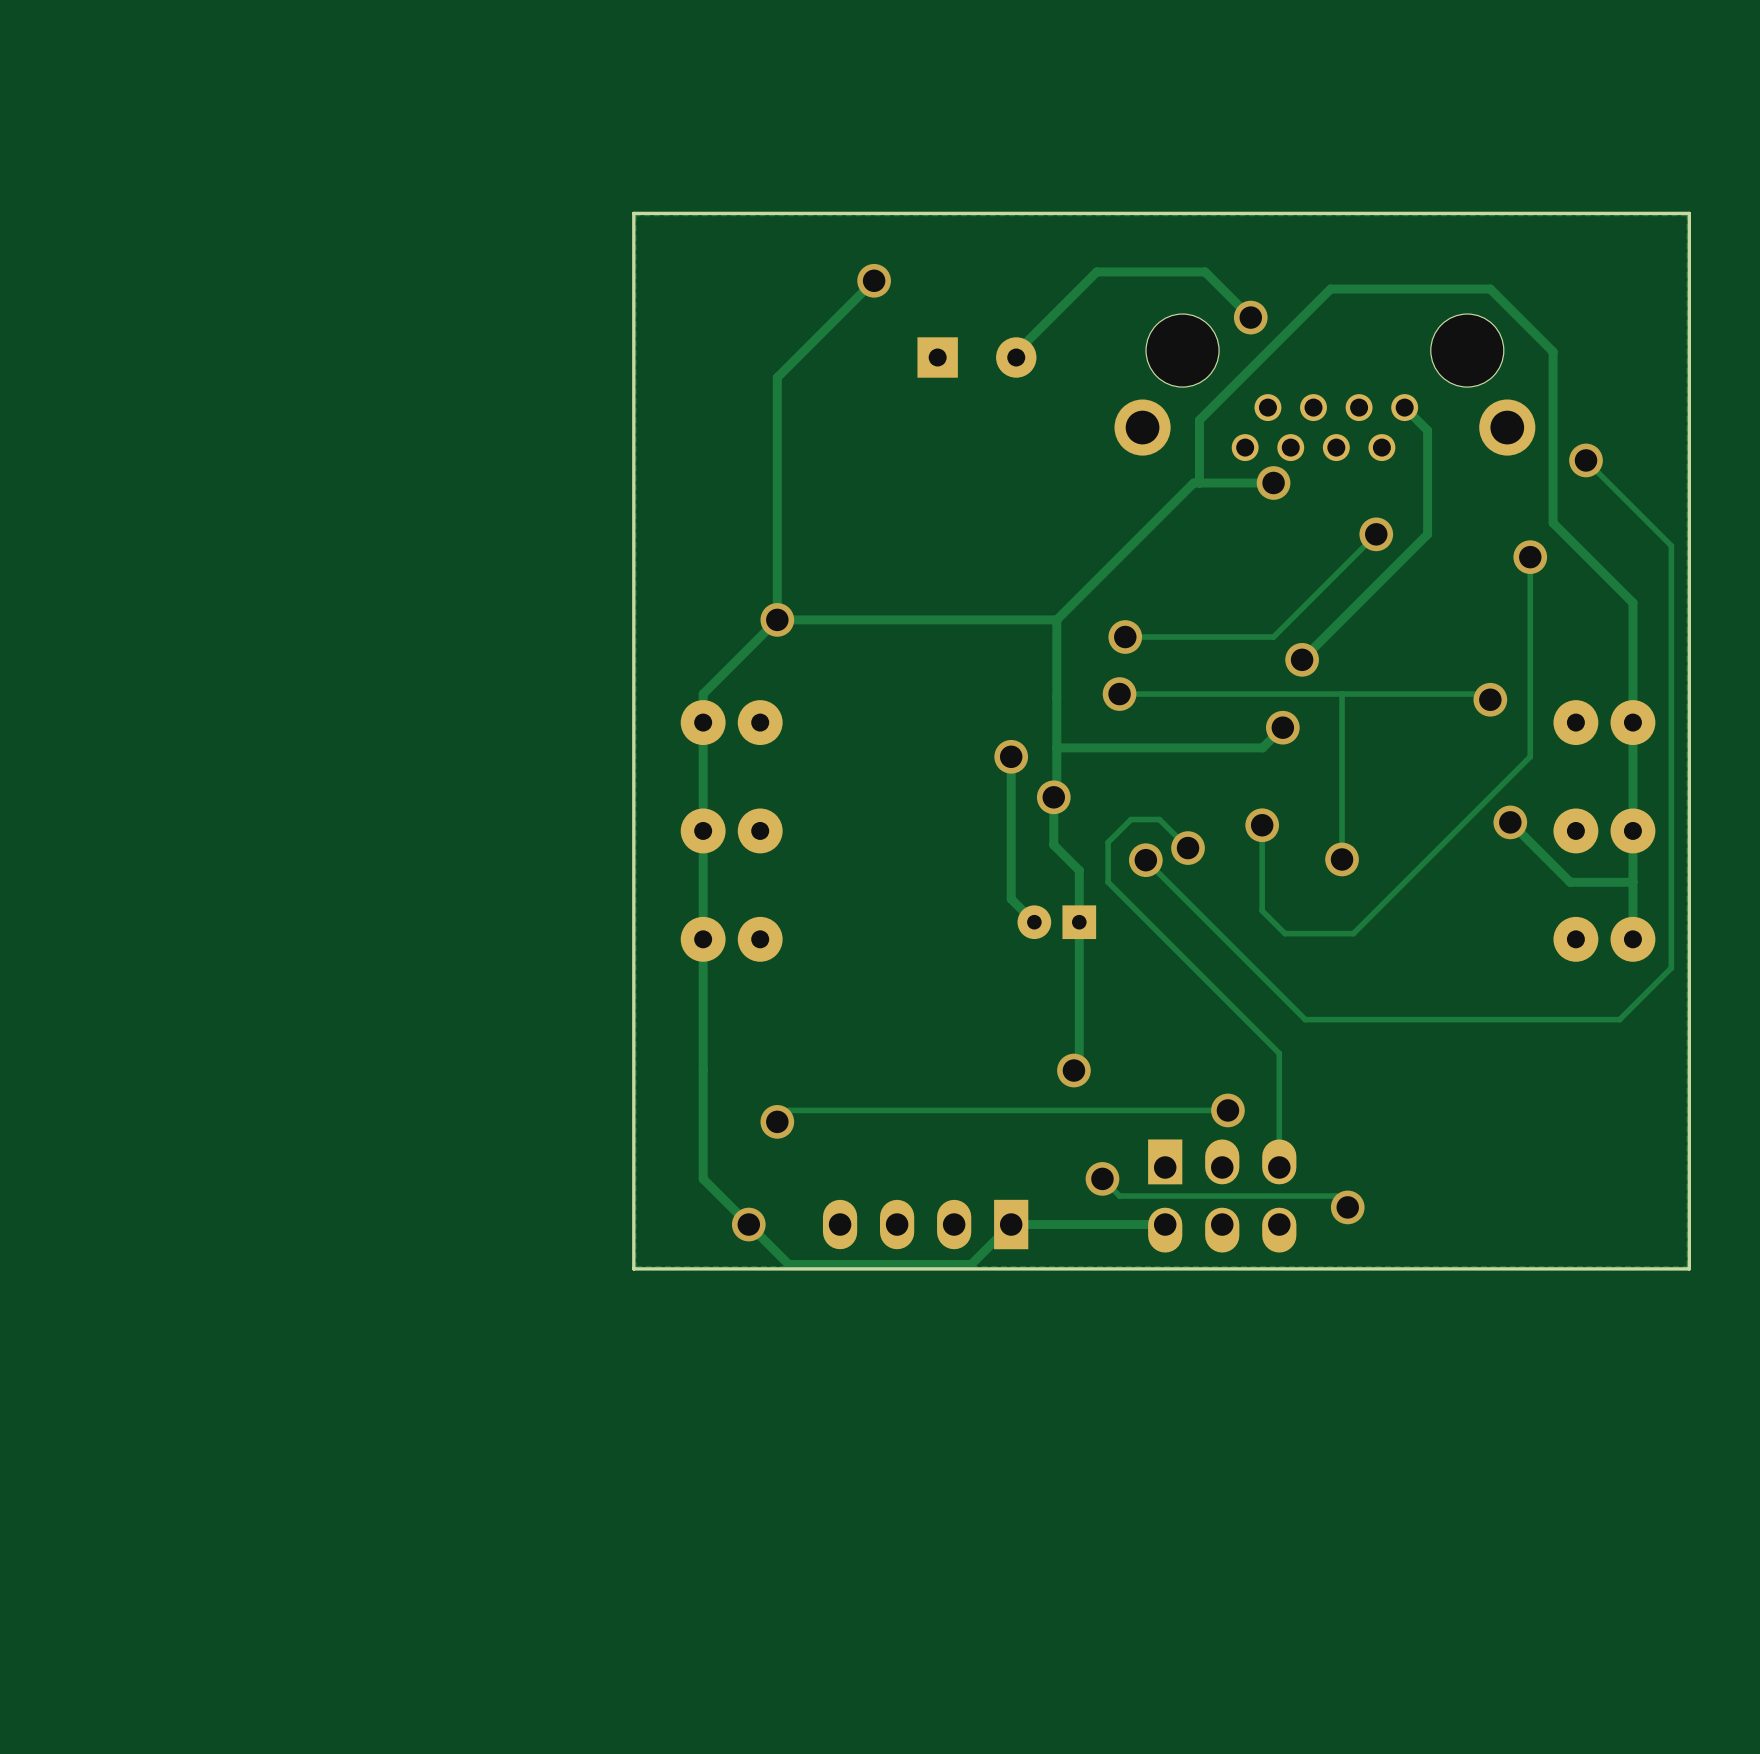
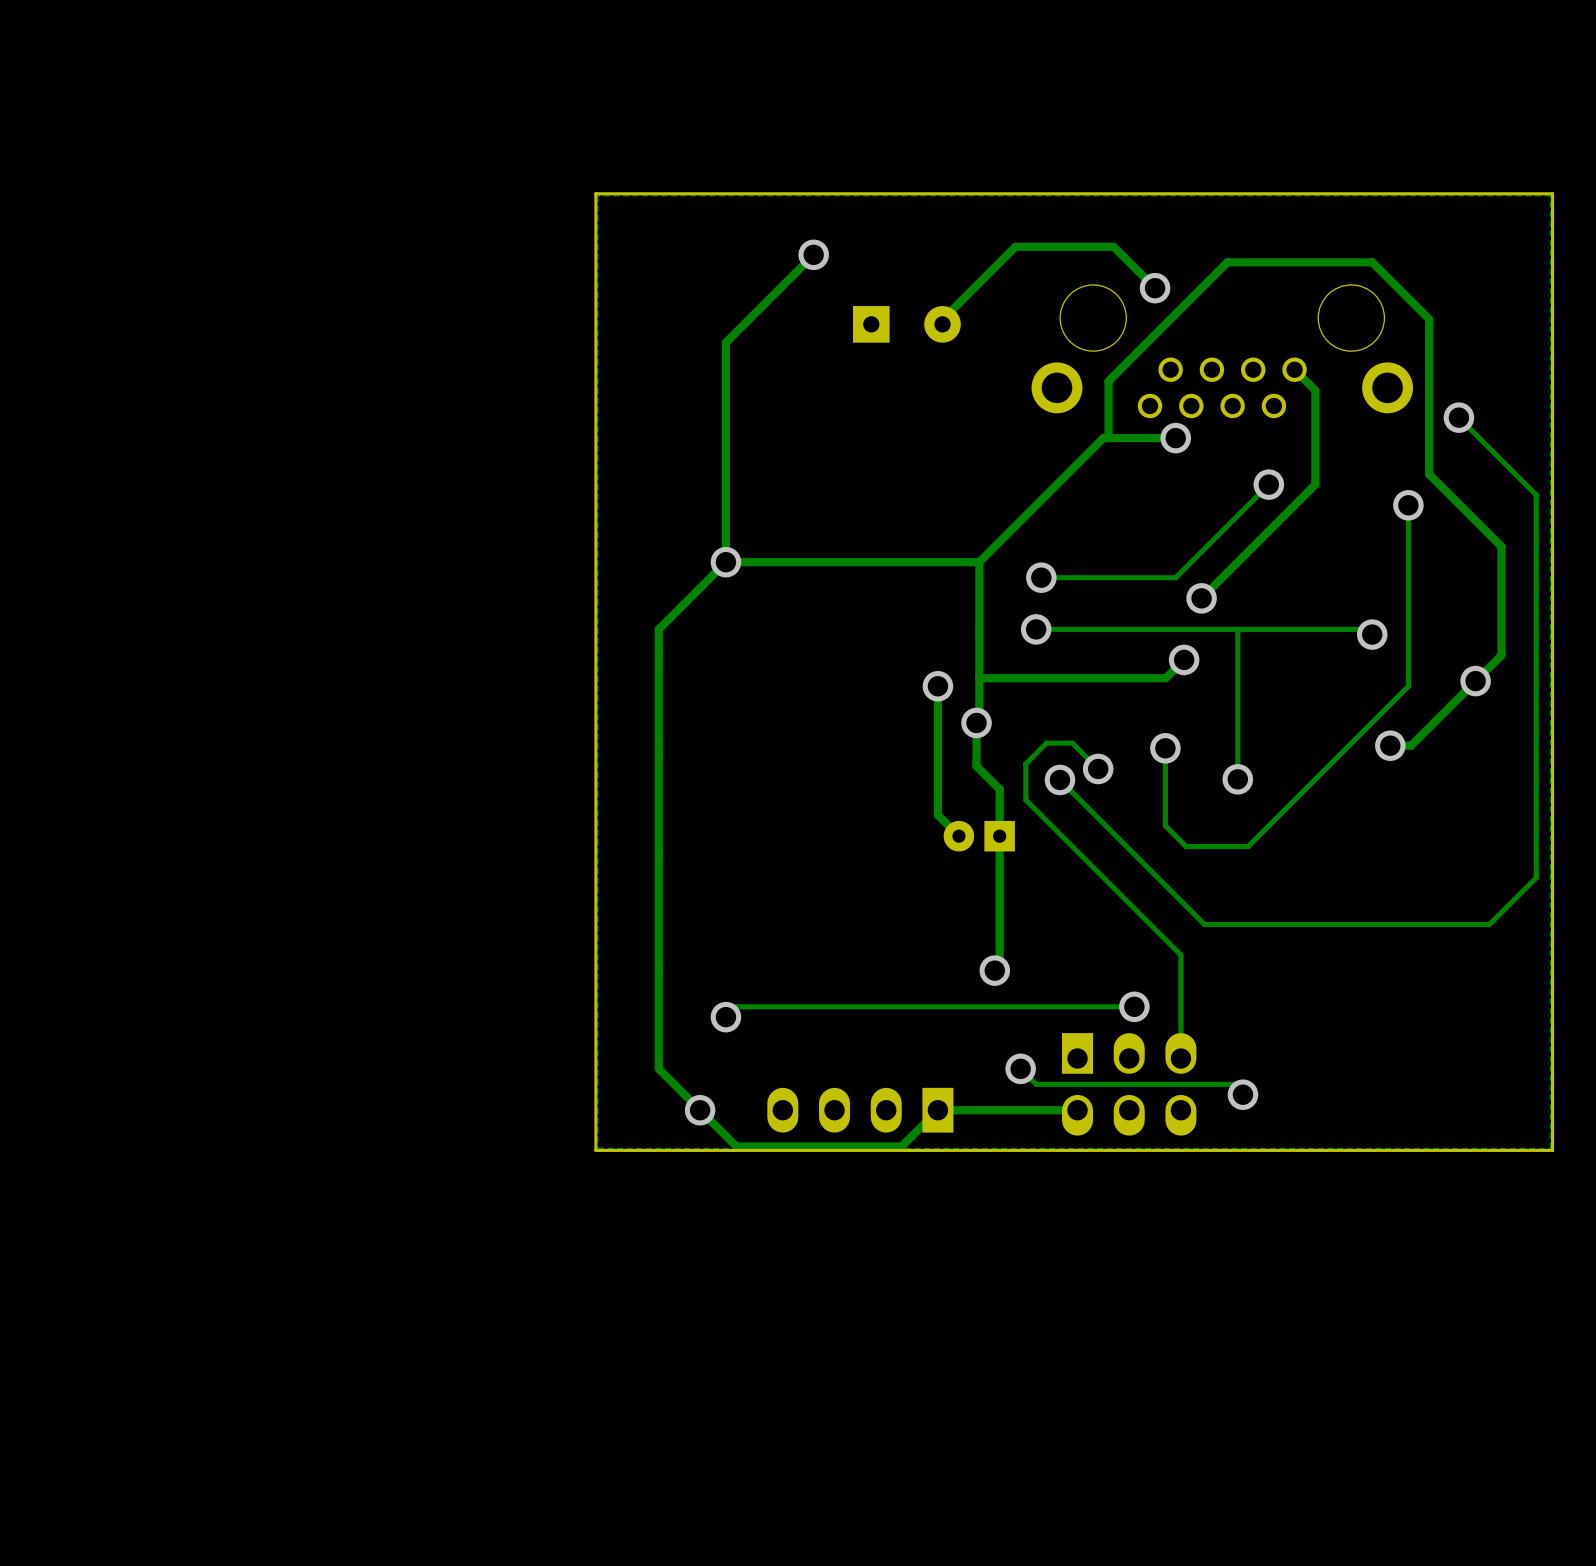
part: (731, 722) -> none
part: (1604, 722) -> none
track: (1632, 722) (1632, 939) -> none
via: none -> (1475, 681)
track: (1510, 822) (1570, 882) (1632, 882) -> (1390, 745) (1410, 745) (1501, 655)
part: (731, 830) -> none
part: (1604, 830) -> none
part: (731, 939) -> none
part: (1604, 939) -> none

